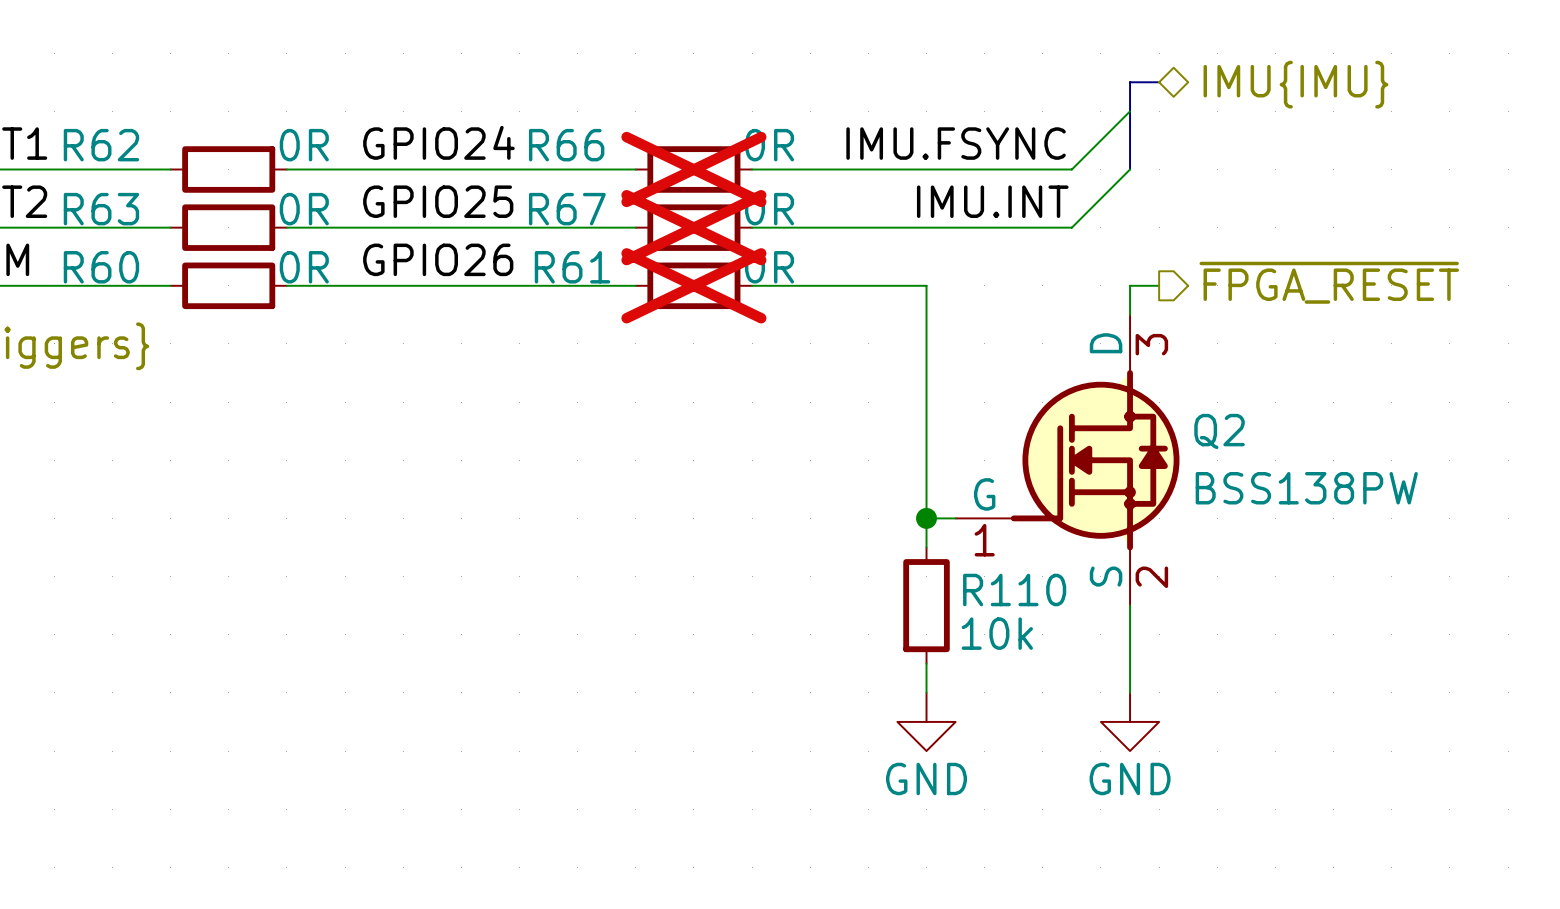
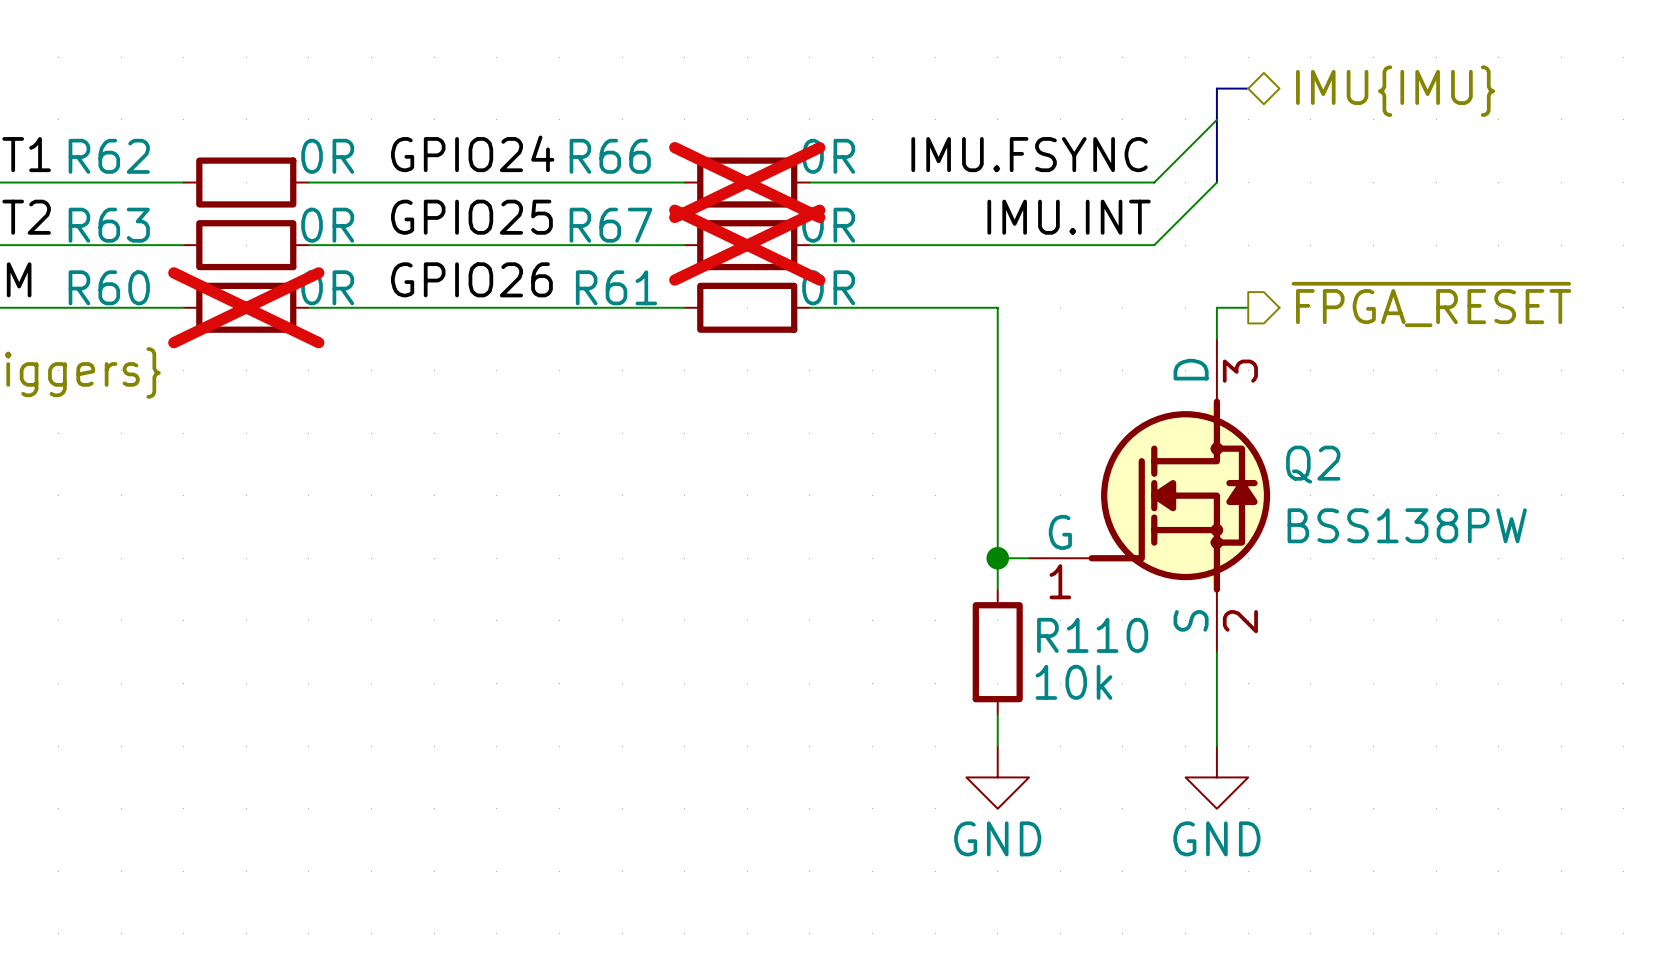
R60 do-not-place cross: none -> (246, 307)
R61 do-not-place cross: (693, 285) -> none

